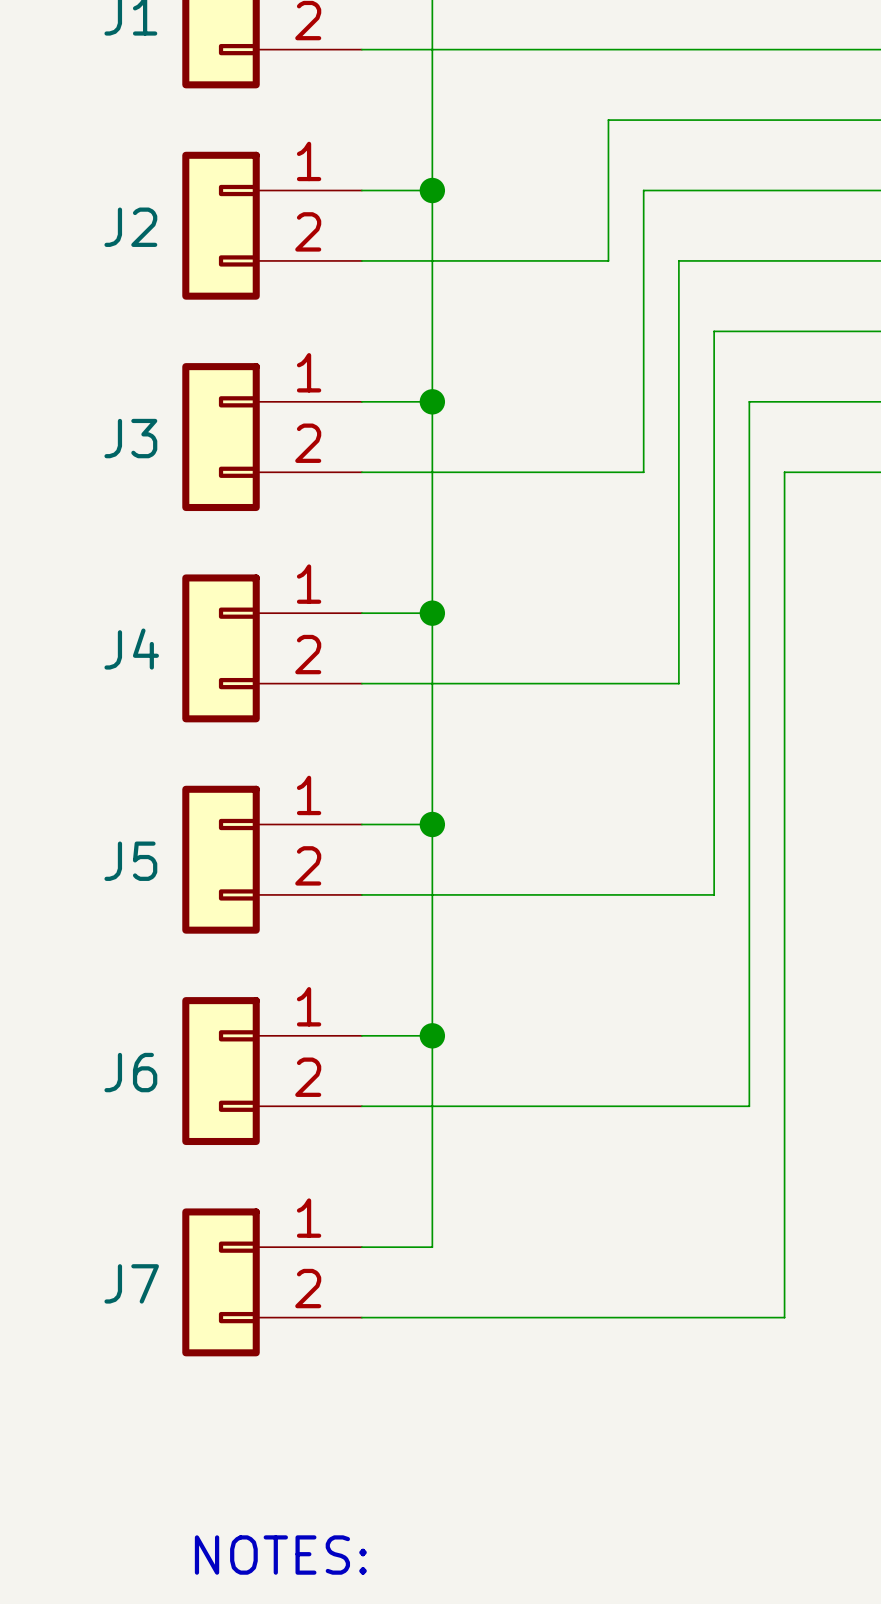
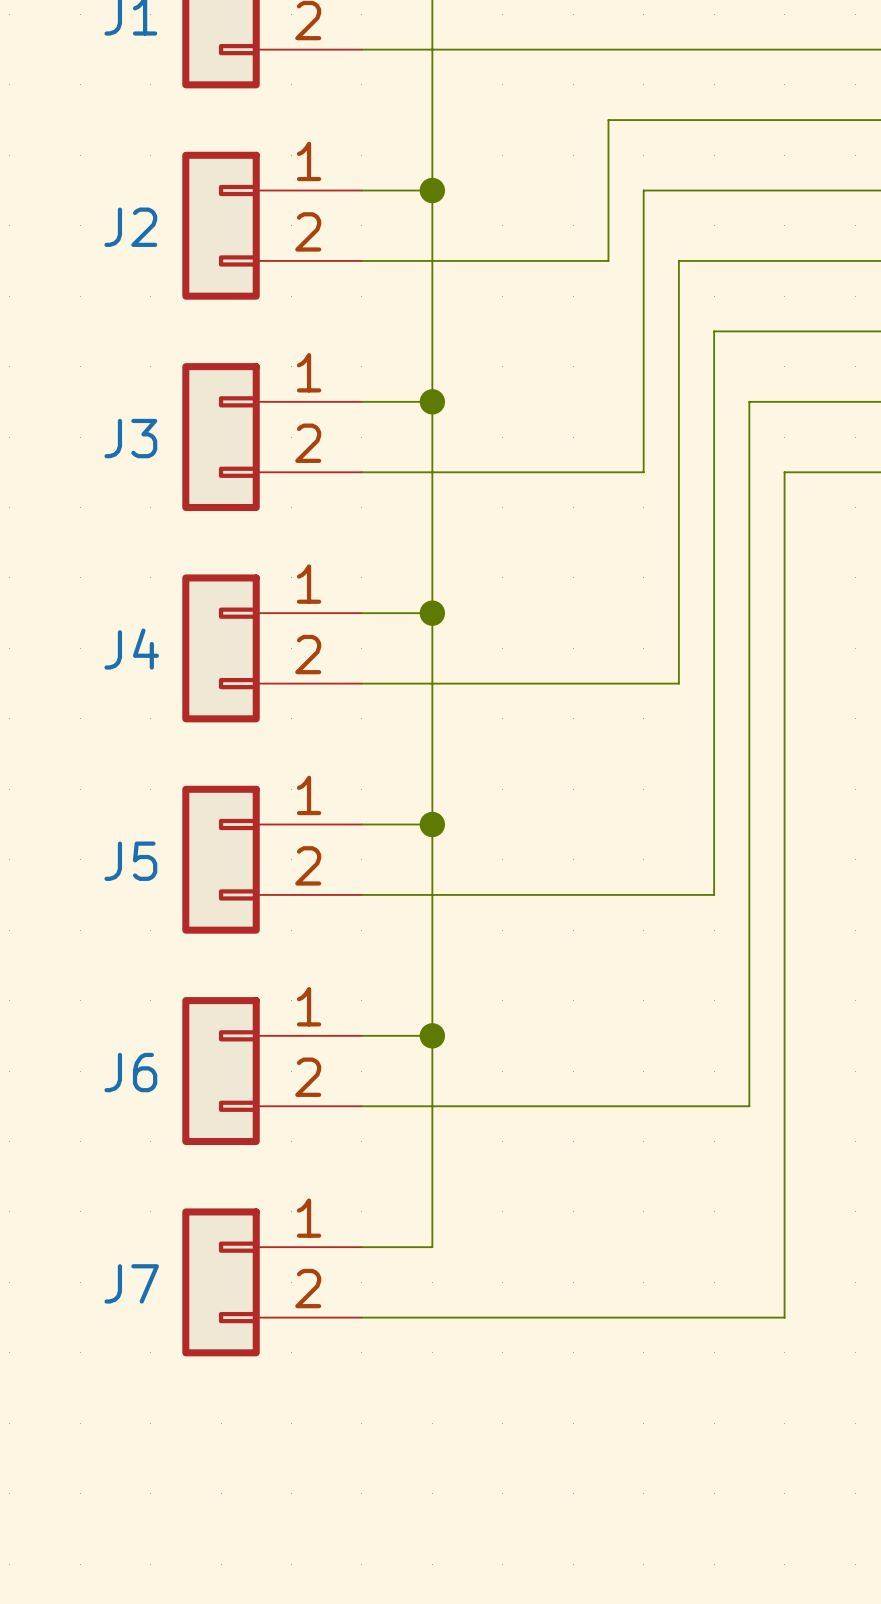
text: NOTES: (280, 1555) -> none

